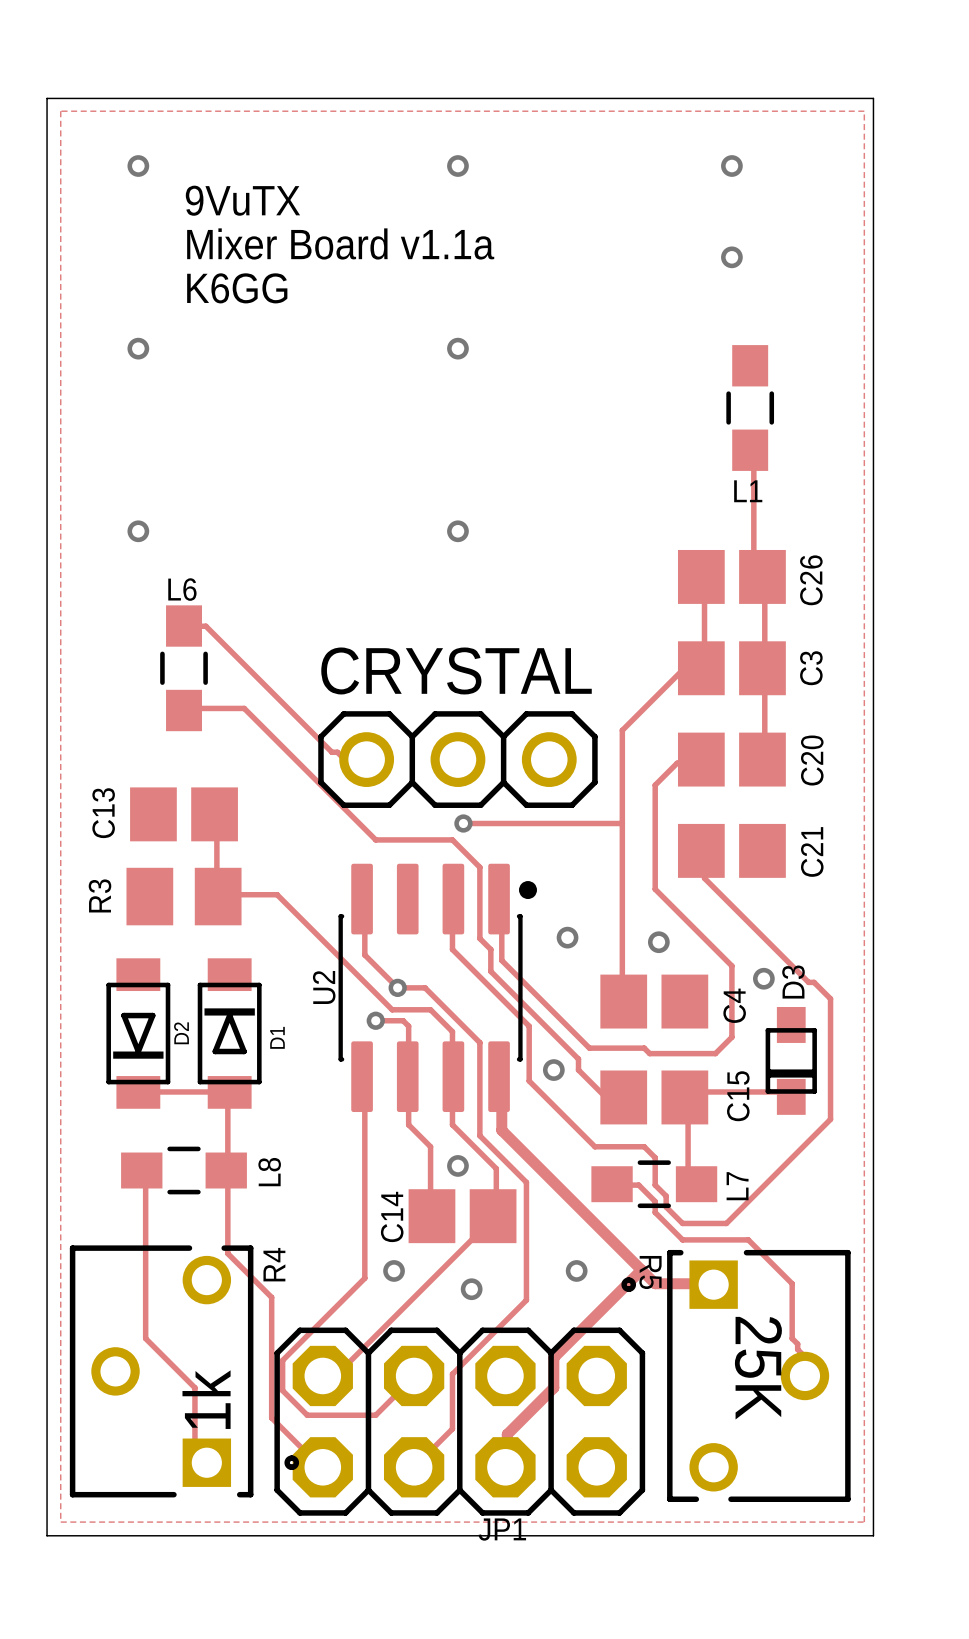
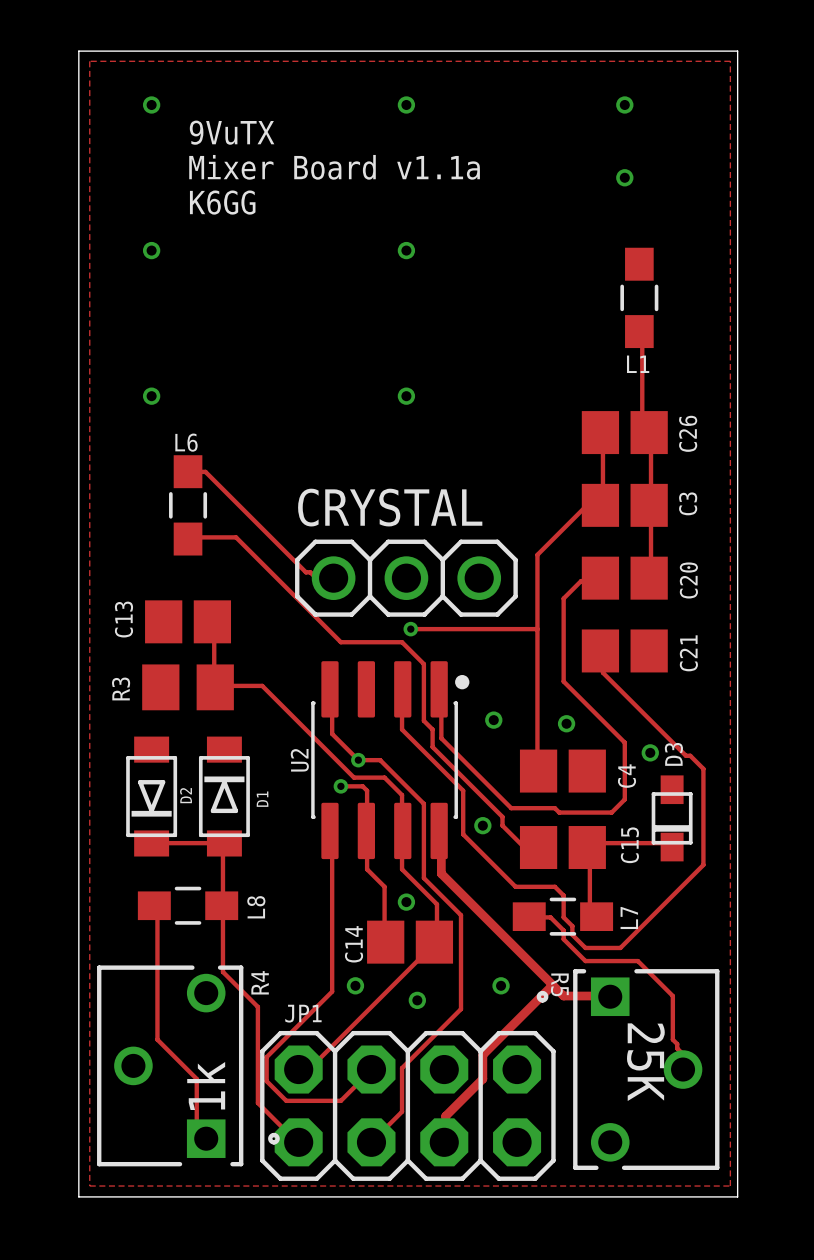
JP1 name position: JP1 (502, 1529) -> JP1 (303, 1013)

